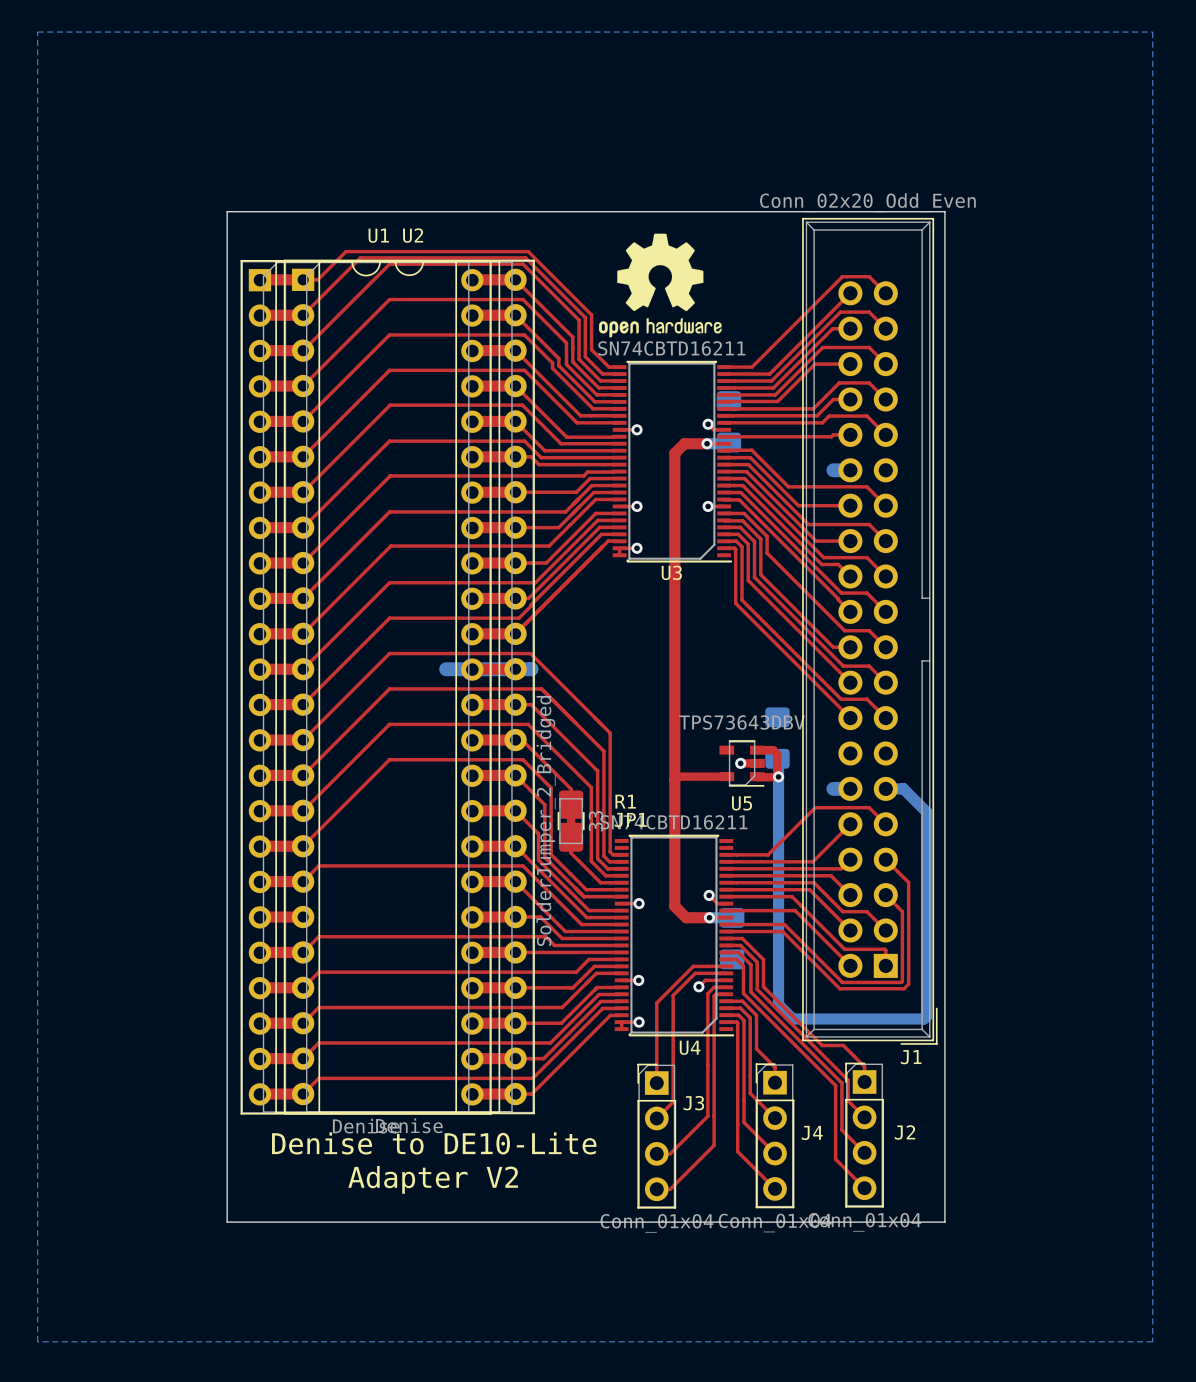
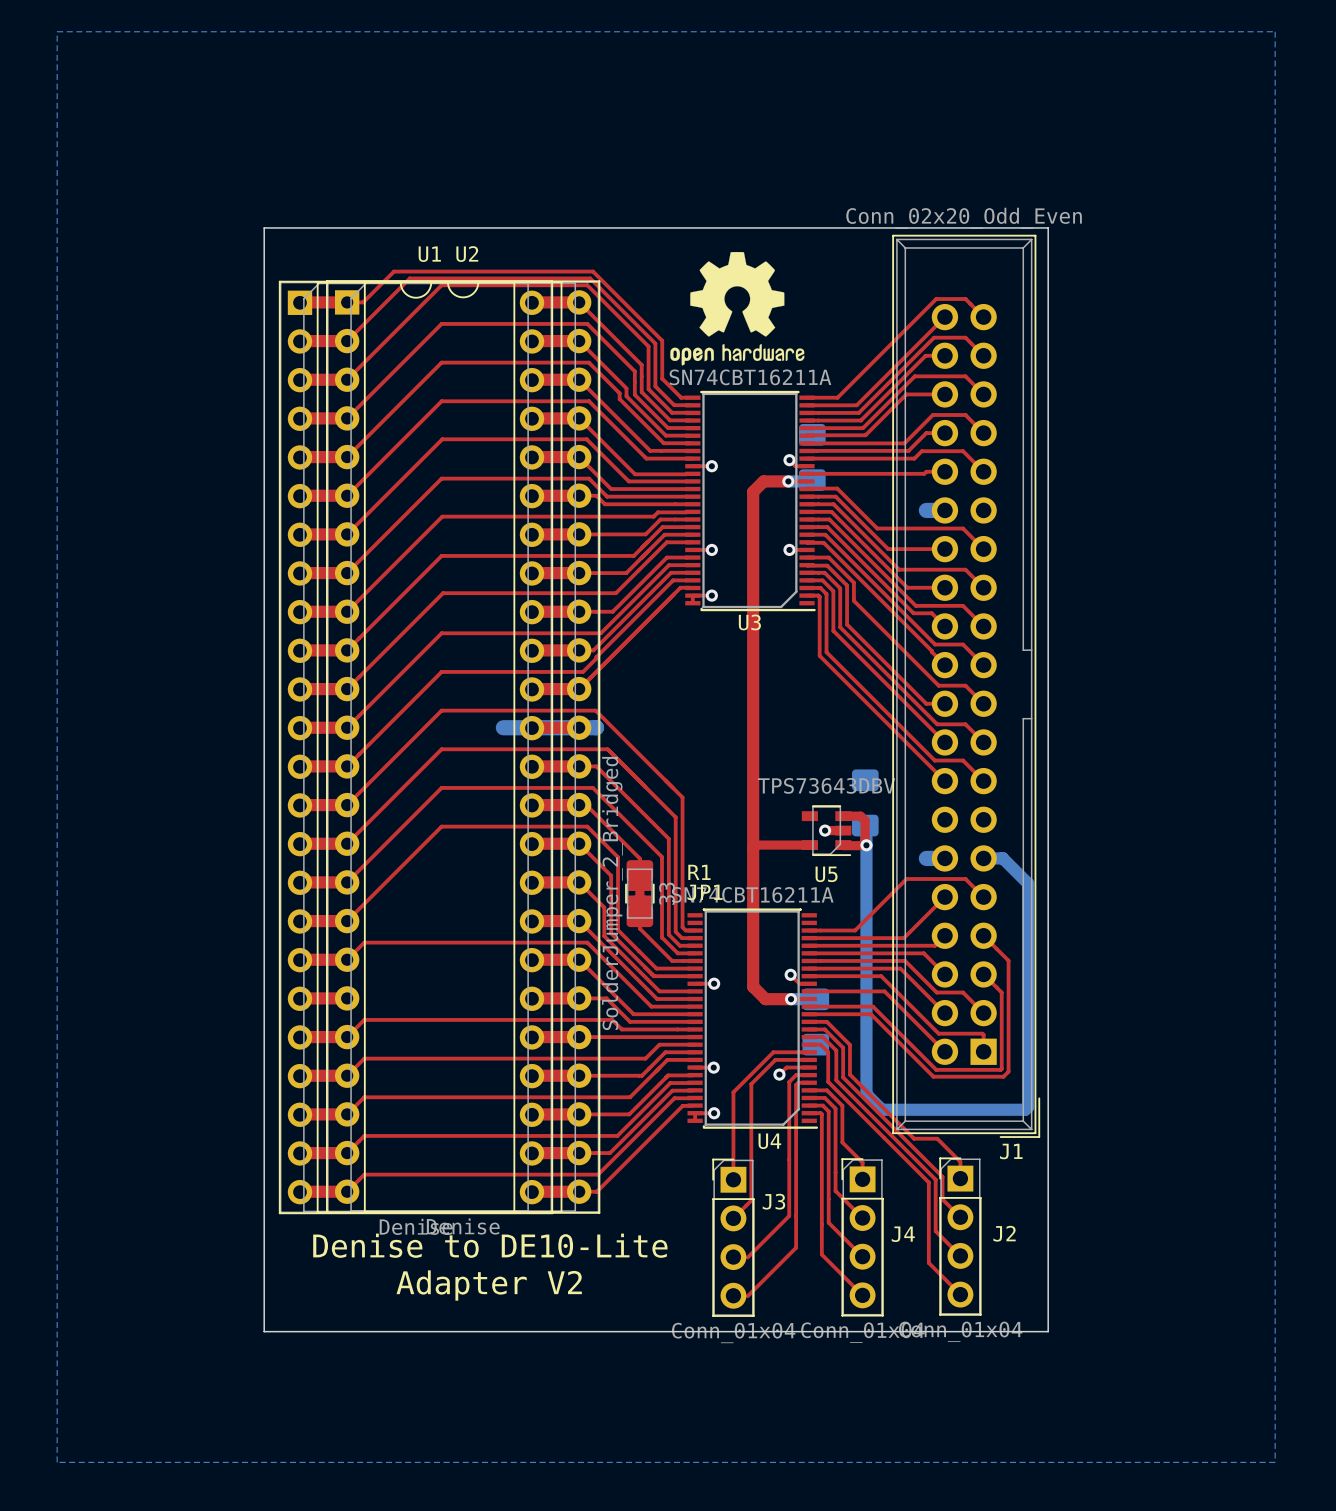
U3 value: SN74CBTD16211 (671, 348) -> SN74CBT16211A (750, 377)
U4 value: SN74CBTD16211 (673, 822) -> SN74CBT16211A (752, 894)

